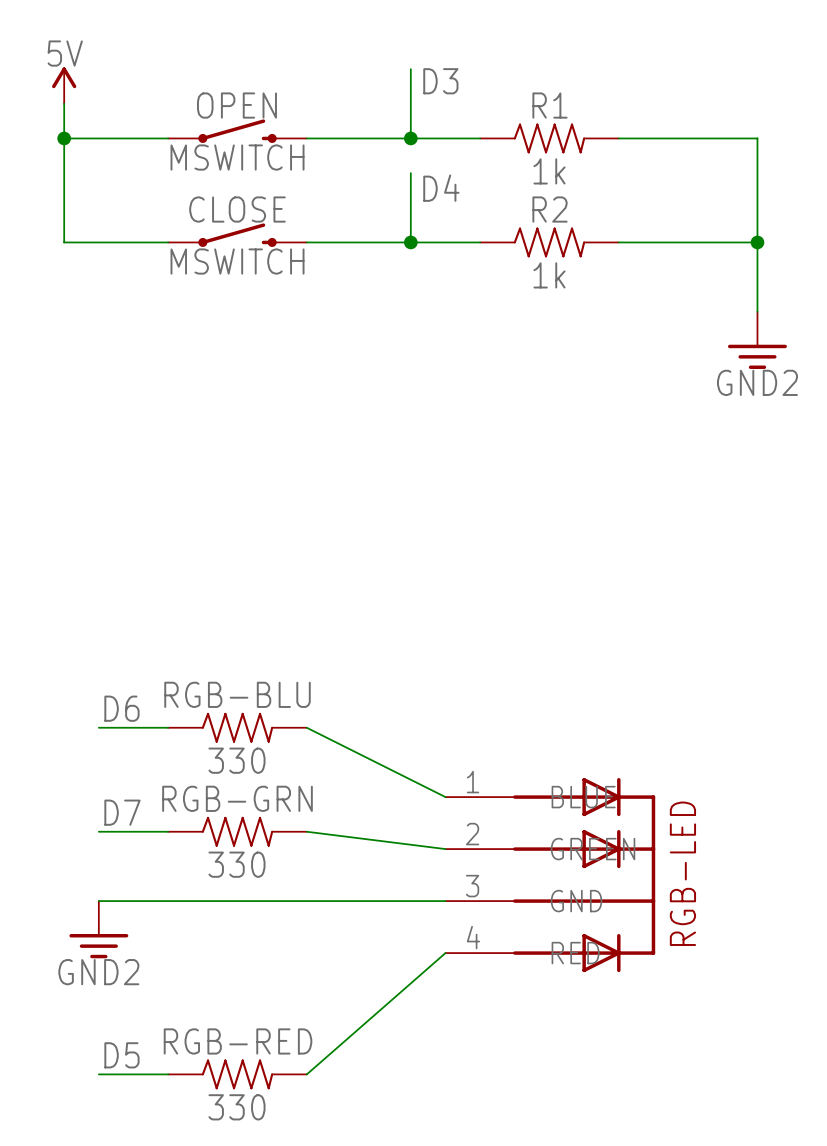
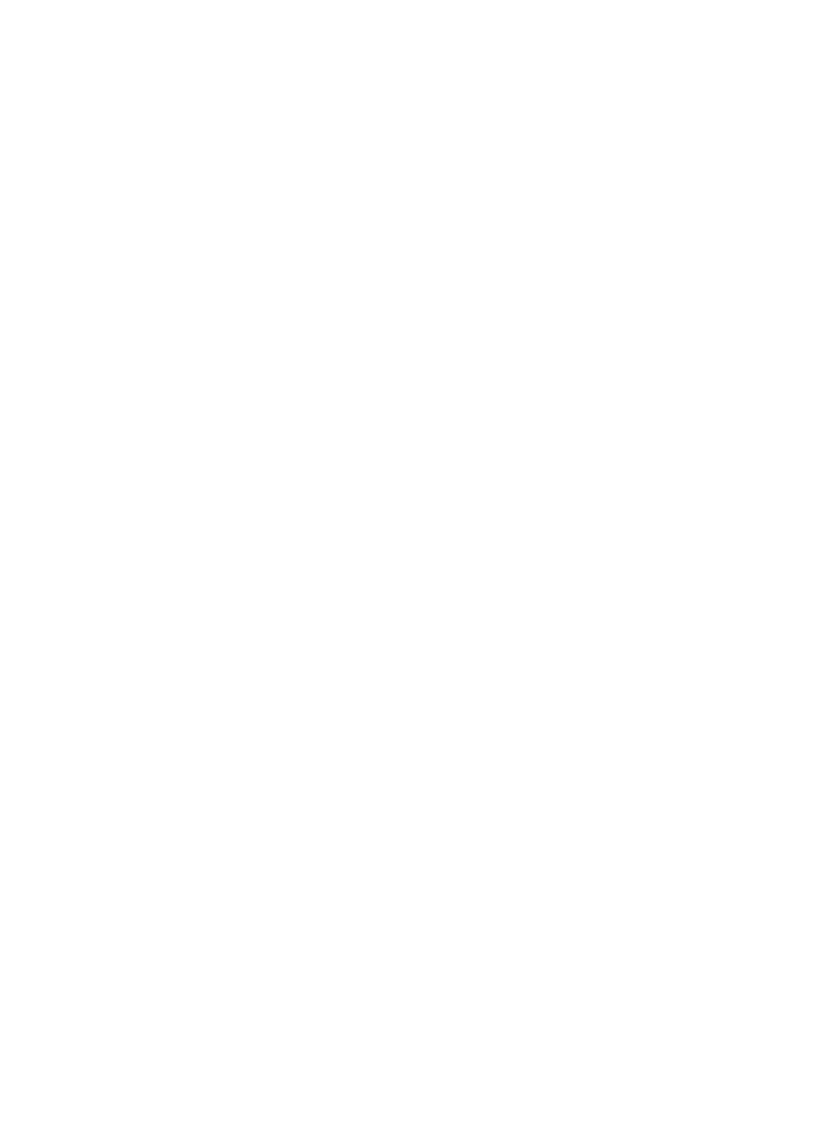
wire: (410, 69) (410, 138) -> none
label: D3 (440, 81) -> none
power symbol: 5V (64, 85) -> none
wire: (64, 103) (64, 242) (168, 242) -> none
OPEN: MSWITCH (237, 131) -> none
wire: (64, 138) (168, 138) -> none
junction: (64, 138) -> none
wire: (306, 138) (480, 138) -> none
junction: (410, 138) -> none
R1: 1k (549, 138) -> none
wire: (618, 138) (757, 138) (757, 311) -> none
wire: (410, 173) (410, 242) -> none
label: D4 (441, 188) -> none
CLOSE: MSWITCH (237, 235) -> none
wire: (306, 242) (480, 242) -> none
junction: (410, 242) -> none
R2: 1k (549, 242) -> none
wire: (618, 242) (757, 242) -> none
junction: (757, 242) -> none
power symbol: GND2 (757, 340) -> none
label: D6 (121, 708) -> none
wire: (98, 727) (168, 727) -> none
RGB-BLU: 330 (237, 727) -> none
wire: (306, 727) (445, 797) -> none
label: D7 (122, 812) -> none
wire: (98, 831) (168, 831) -> none
RGB-GRN: 330 (237, 831) -> none
wire: (306, 831) (445, 849) -> none
RGB-LED: (550, 875) -> none
wire: (98, 901) (445, 901) -> none
power symbol: GND2 (98, 929) -> none
wire: (445, 953) (306, 1074) -> none
label: D5 (121, 1055) -> none
wire: (98, 1074) (168, 1074) -> none
RGB-RED: 330 (237, 1074) -> none

